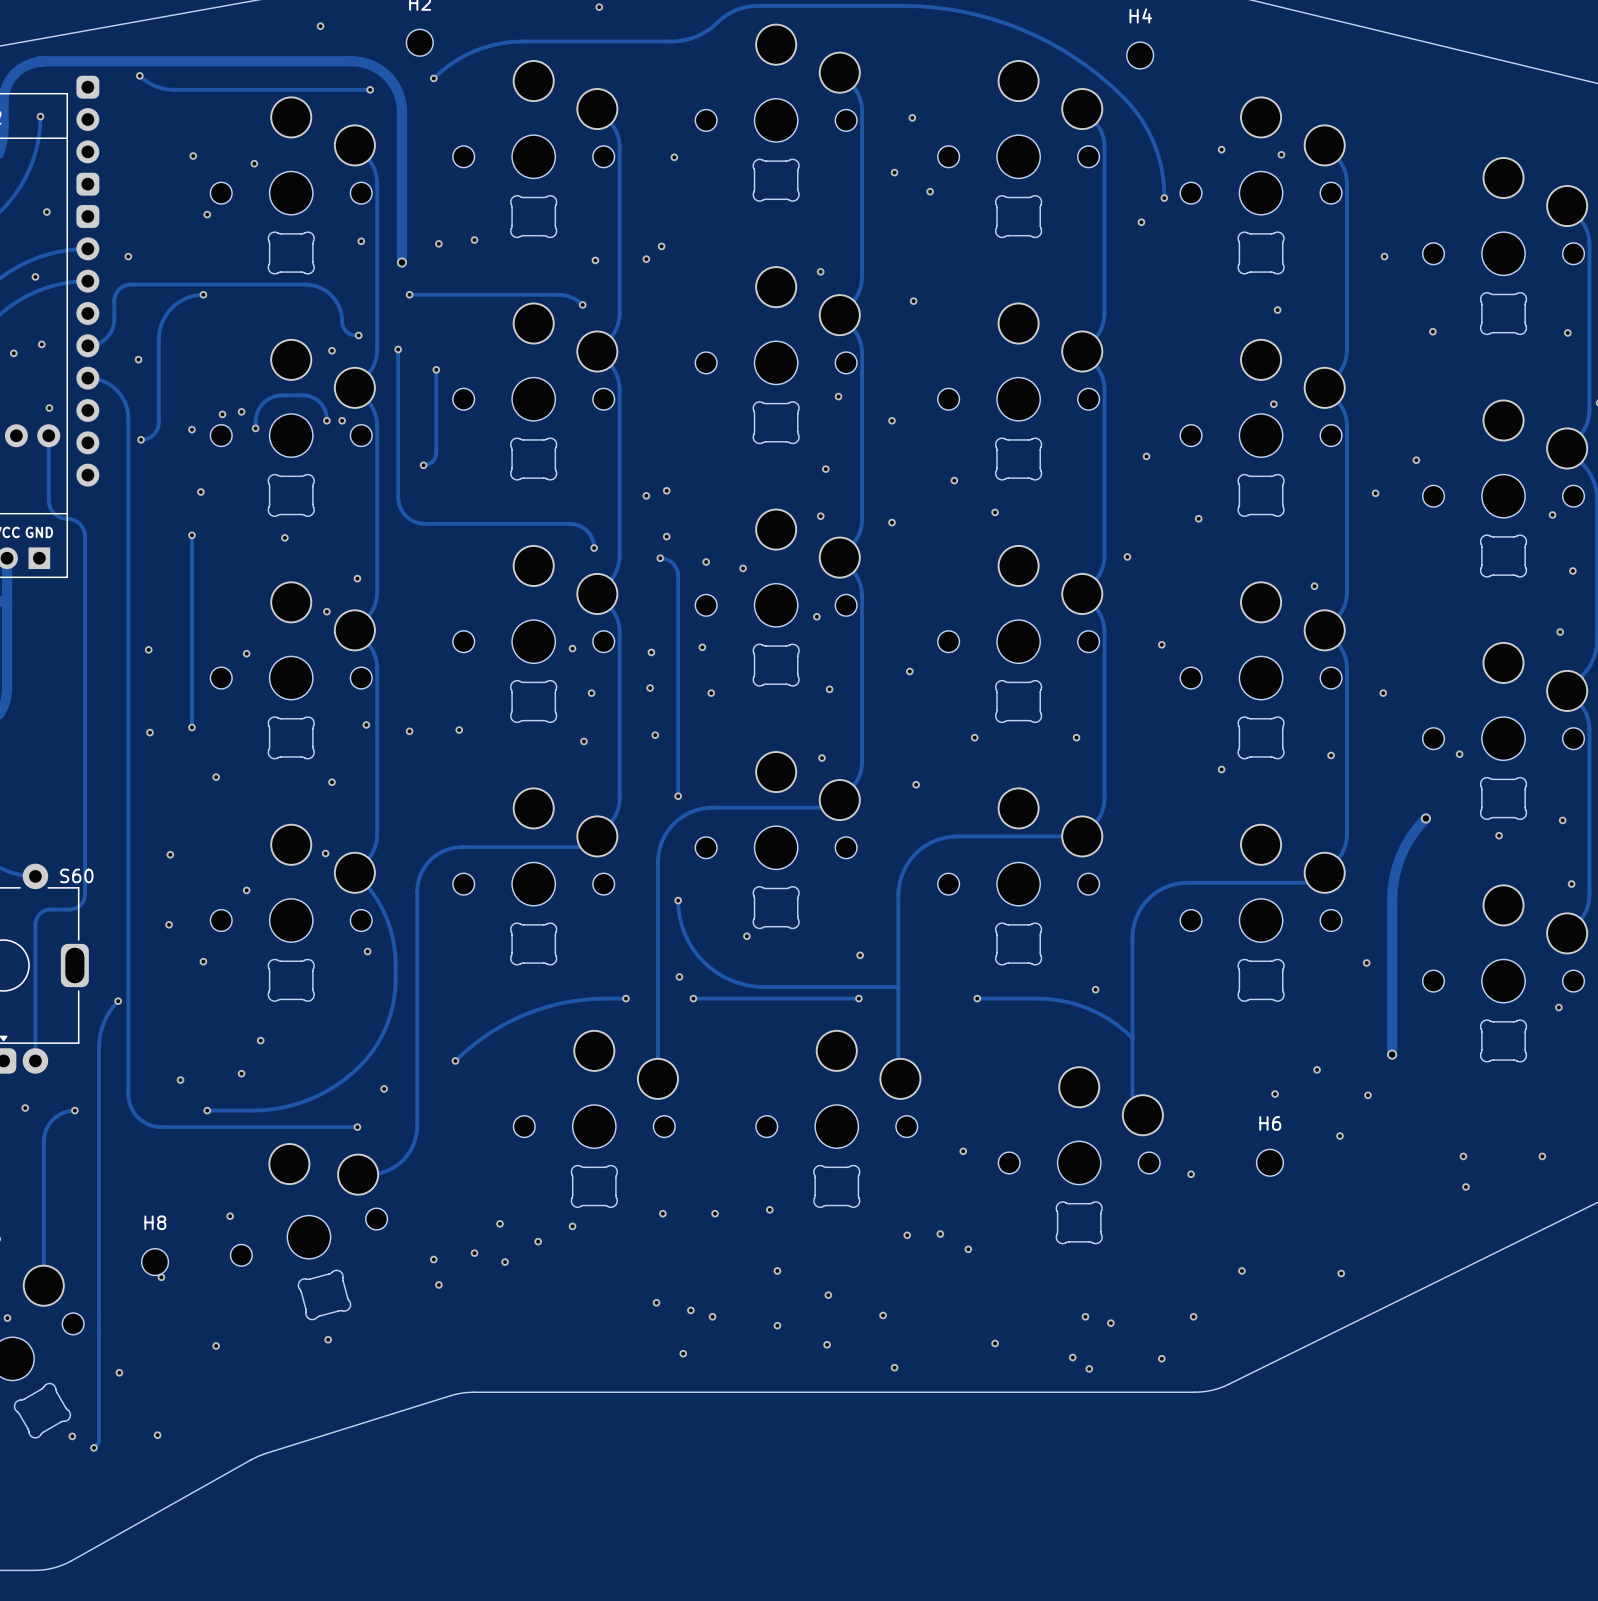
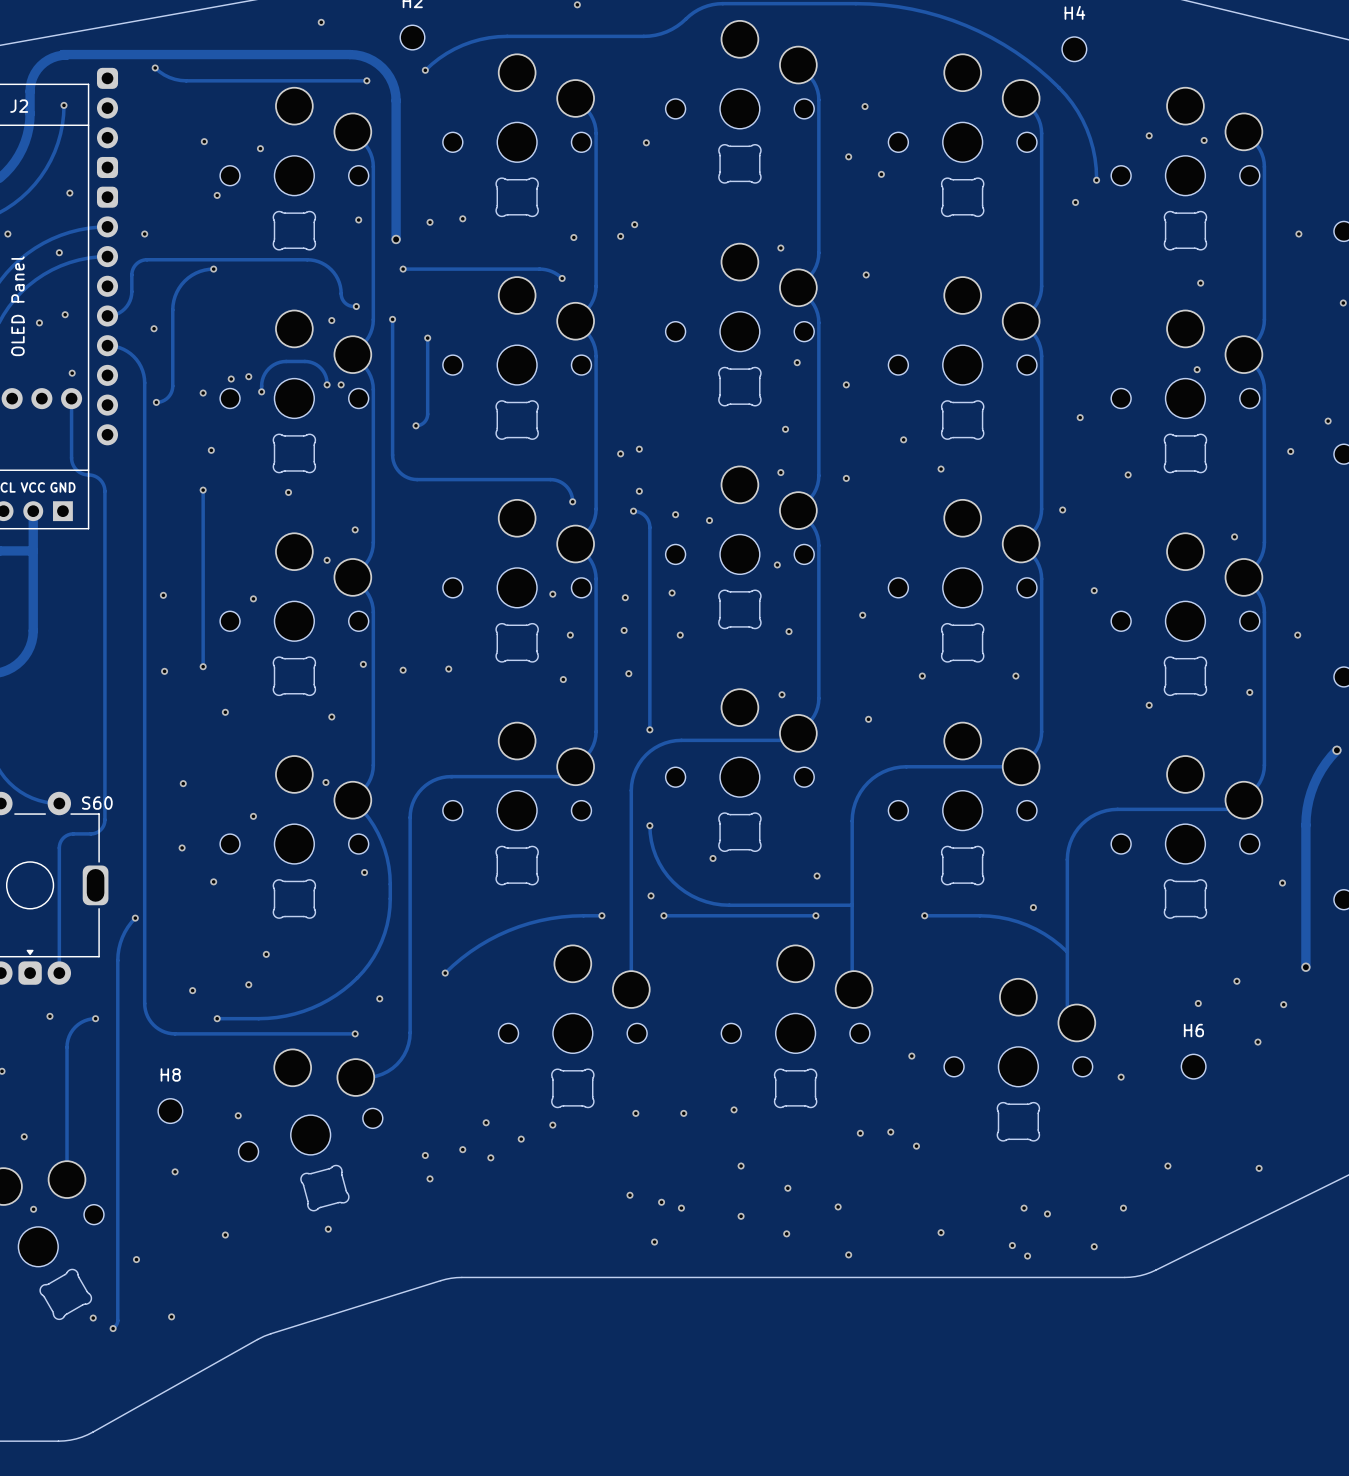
H8 position: (155, 1262) -> (170, 1111)

